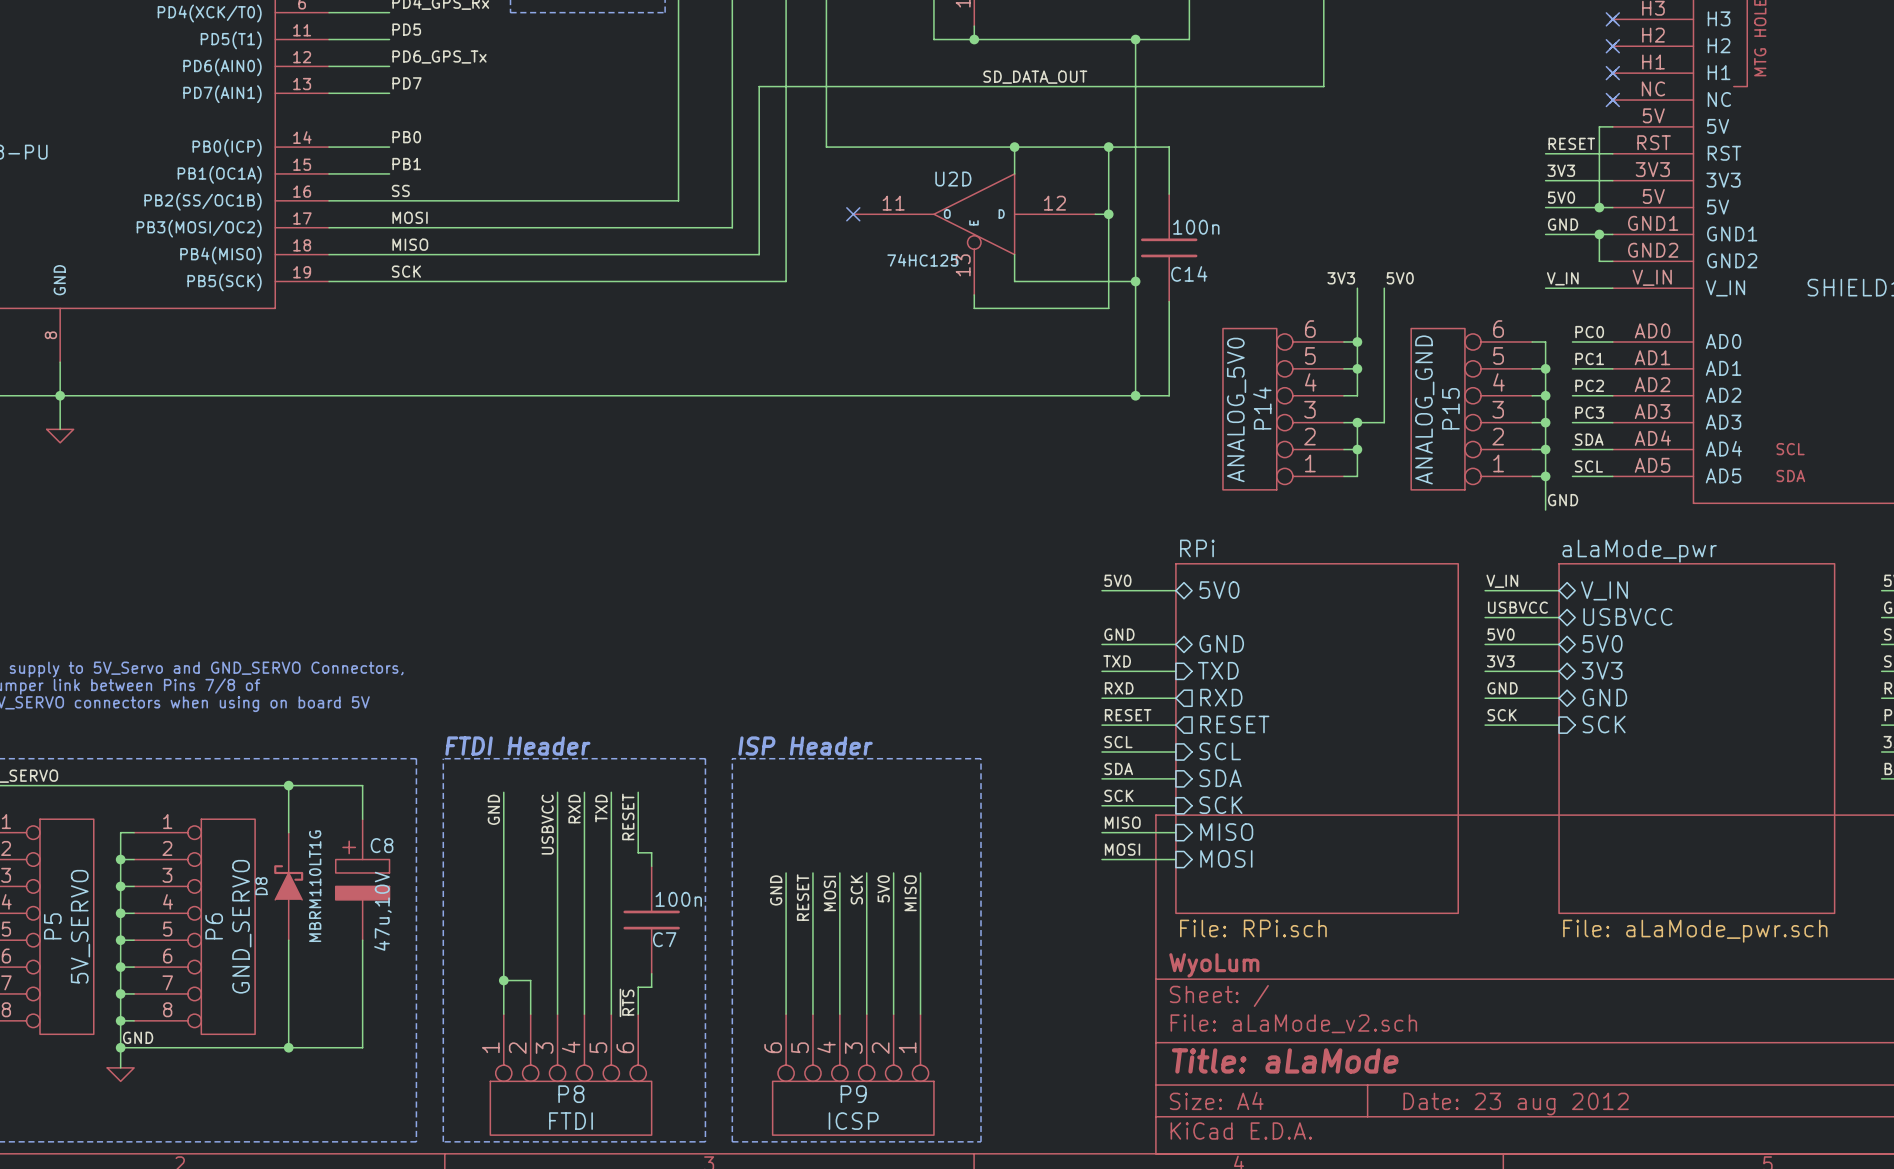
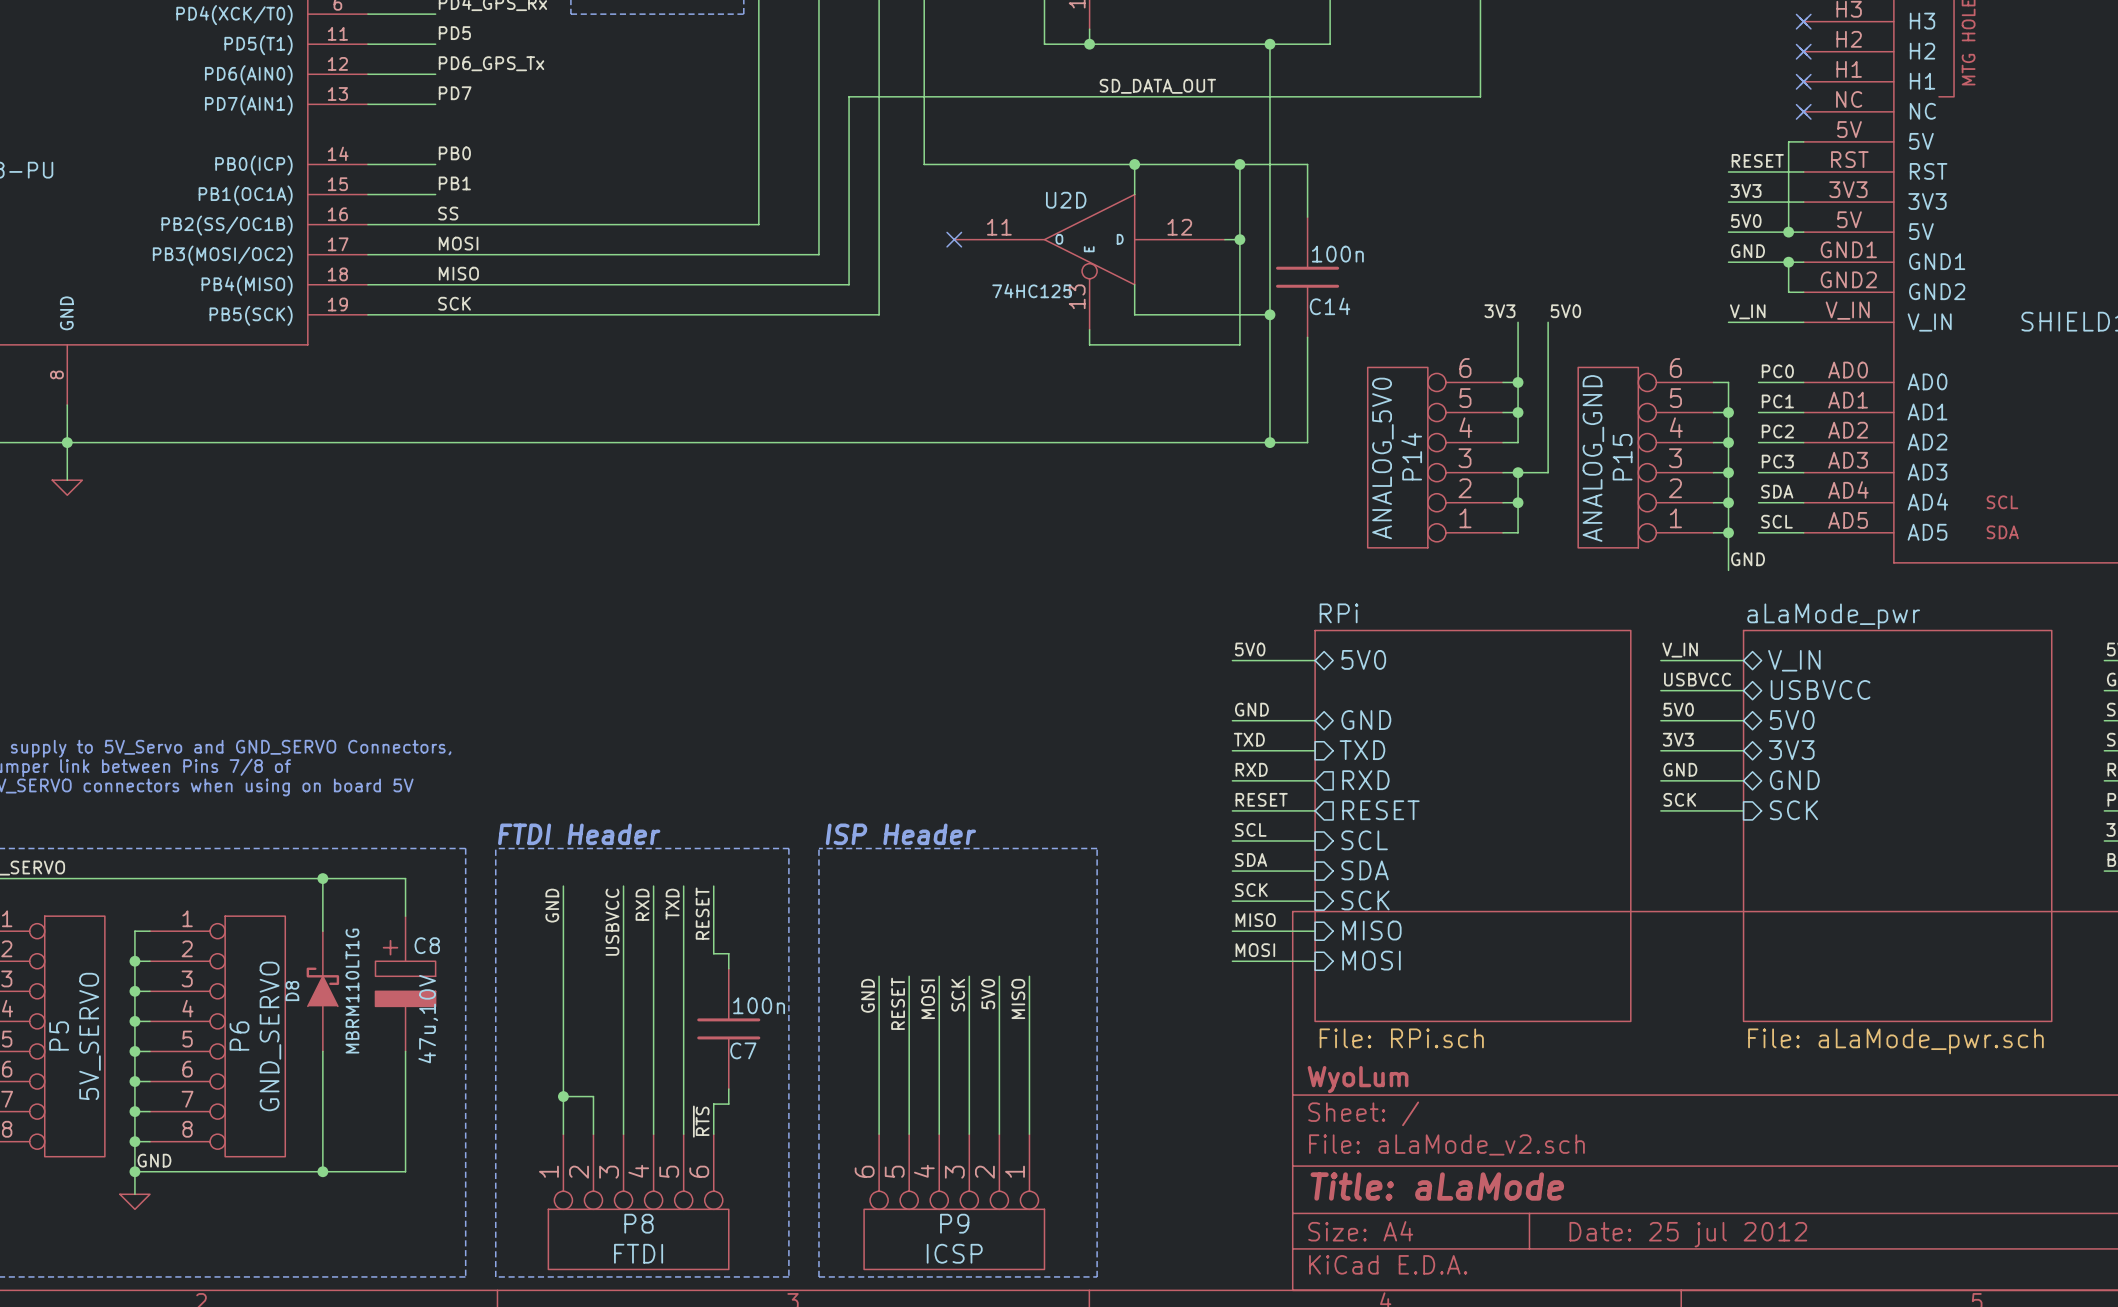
title block: Date: 23 aug 2012 (1516, 1104) -> Date: 25 jul 2012 (1688, 1234)

